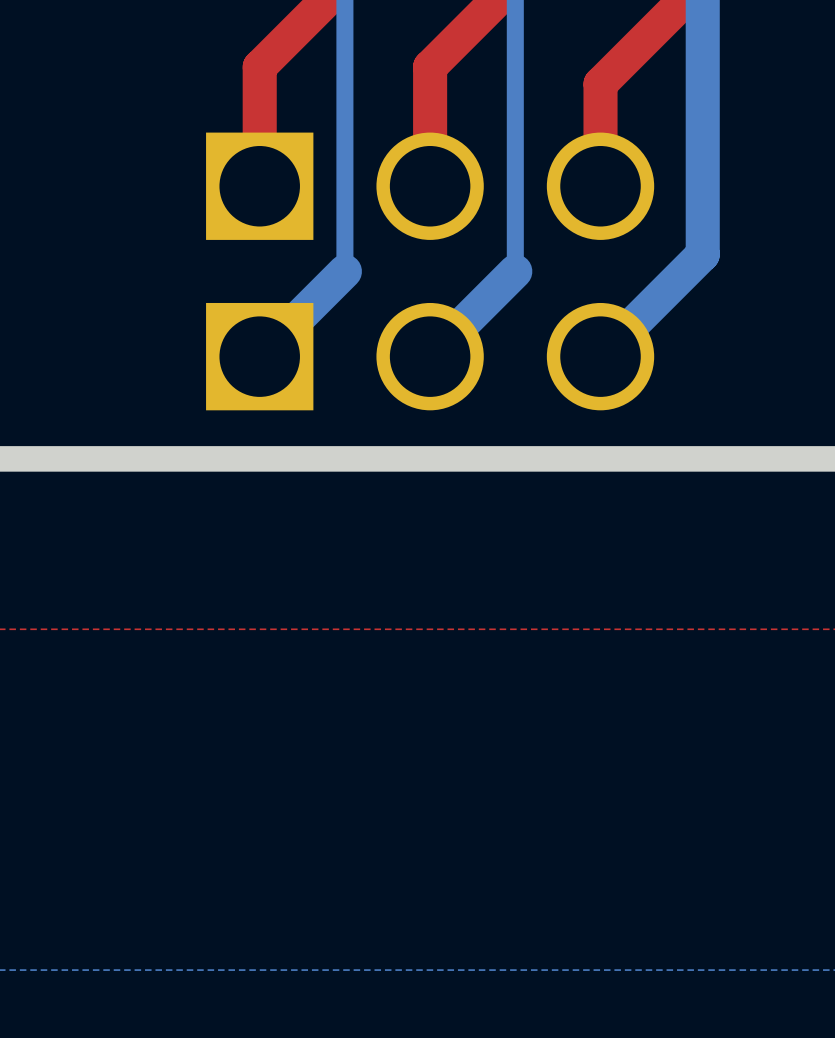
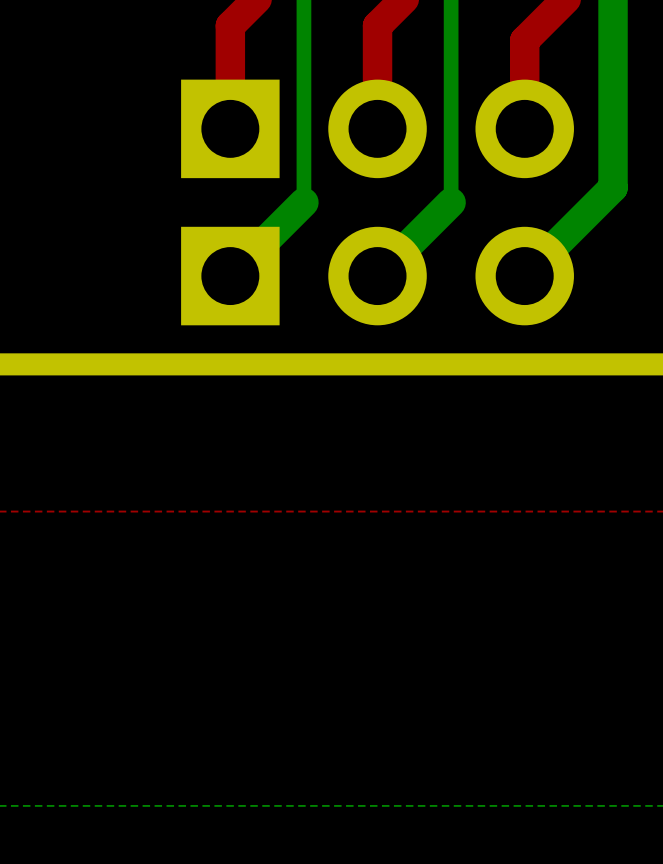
part footprint: [206, 132, 655, 240] -> [181, 79, 574, 179]
part footprint: [206, 302, 655, 411] -> [181, 226, 574, 326]

